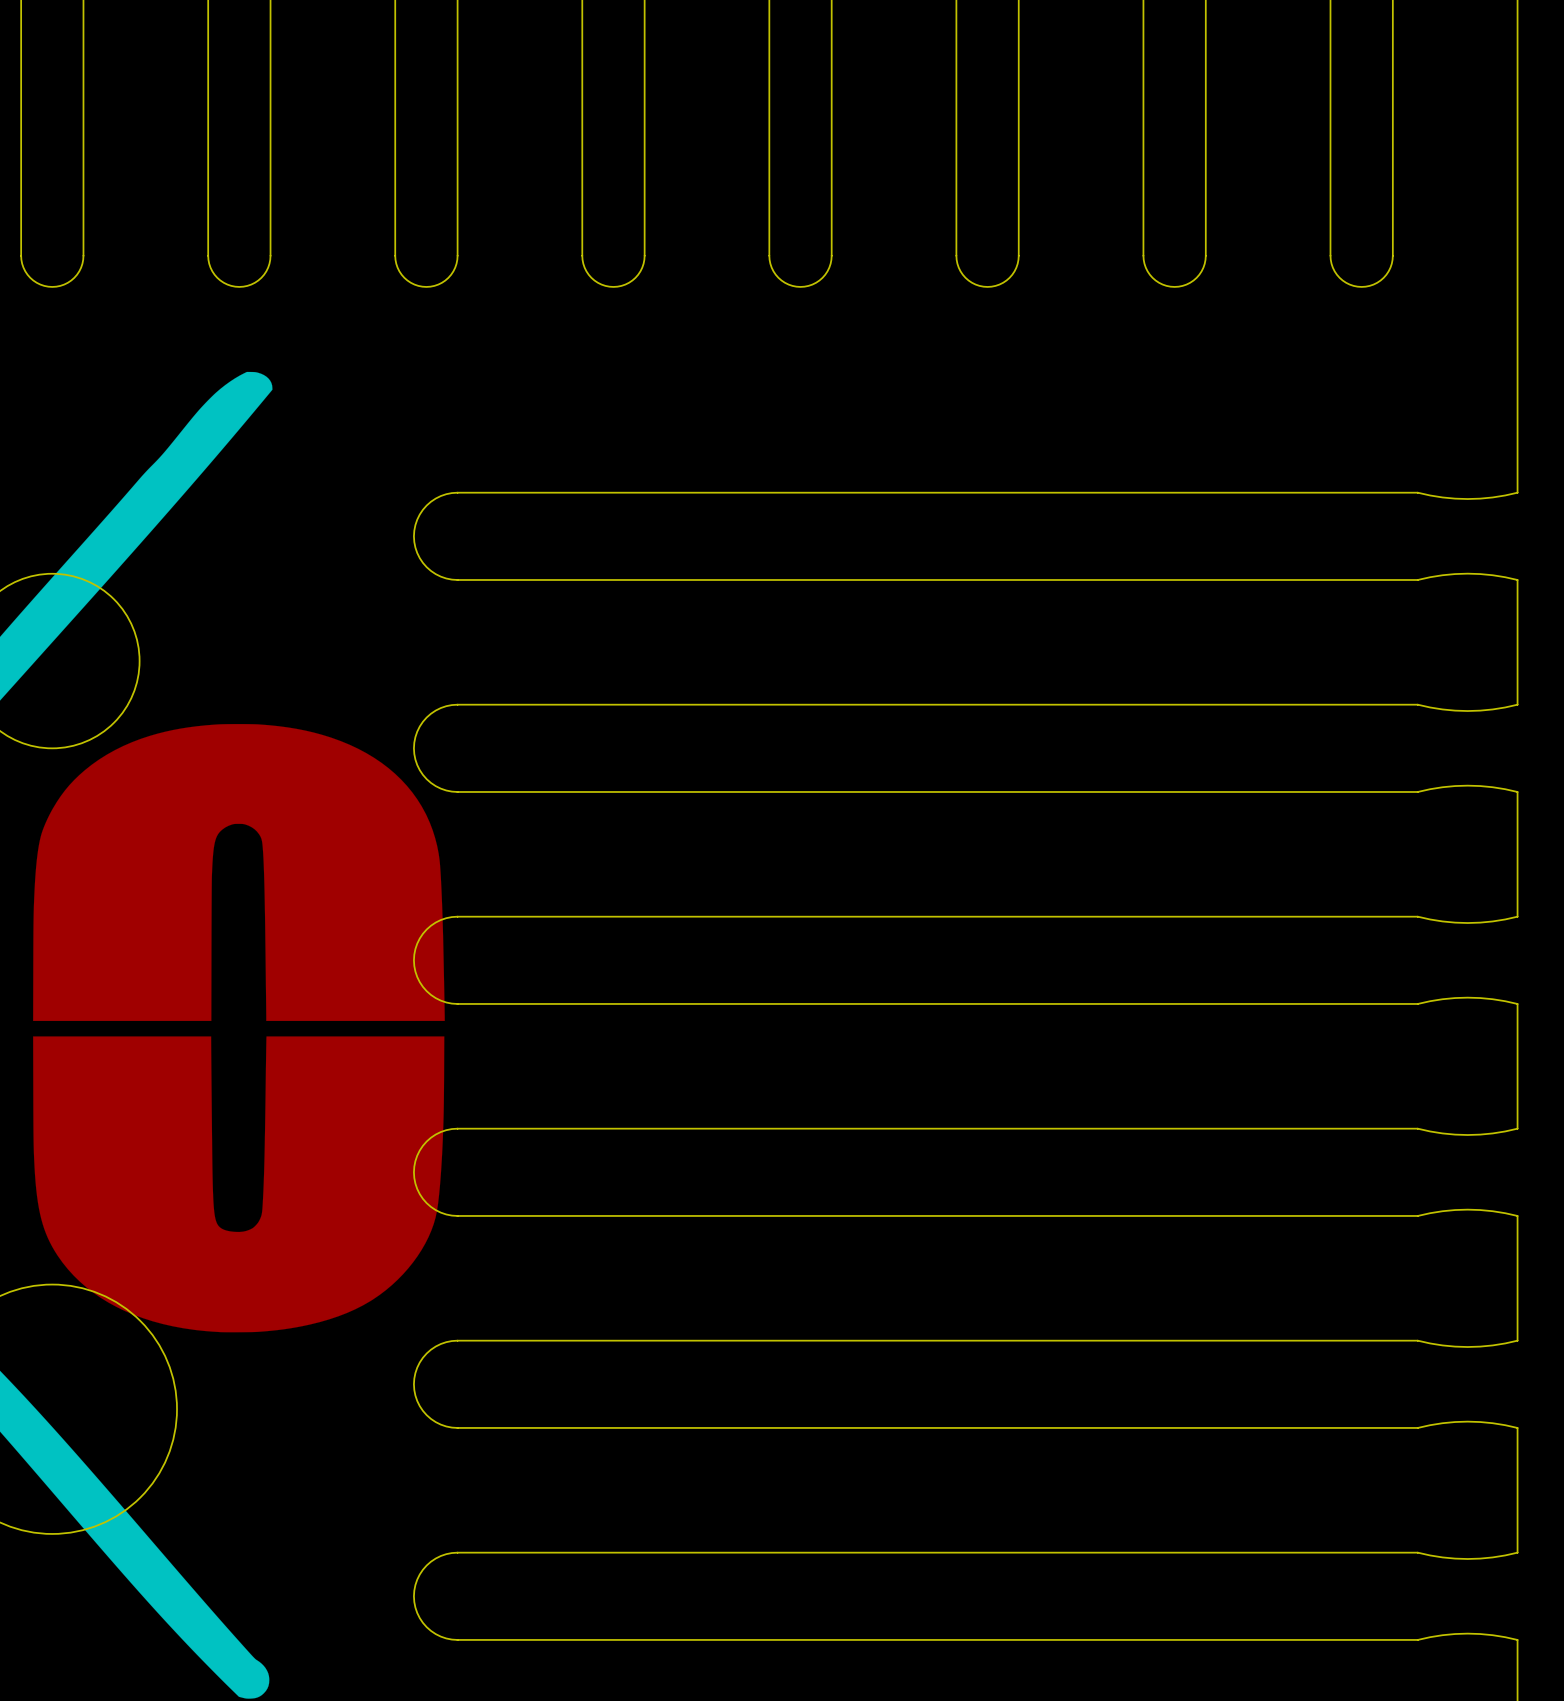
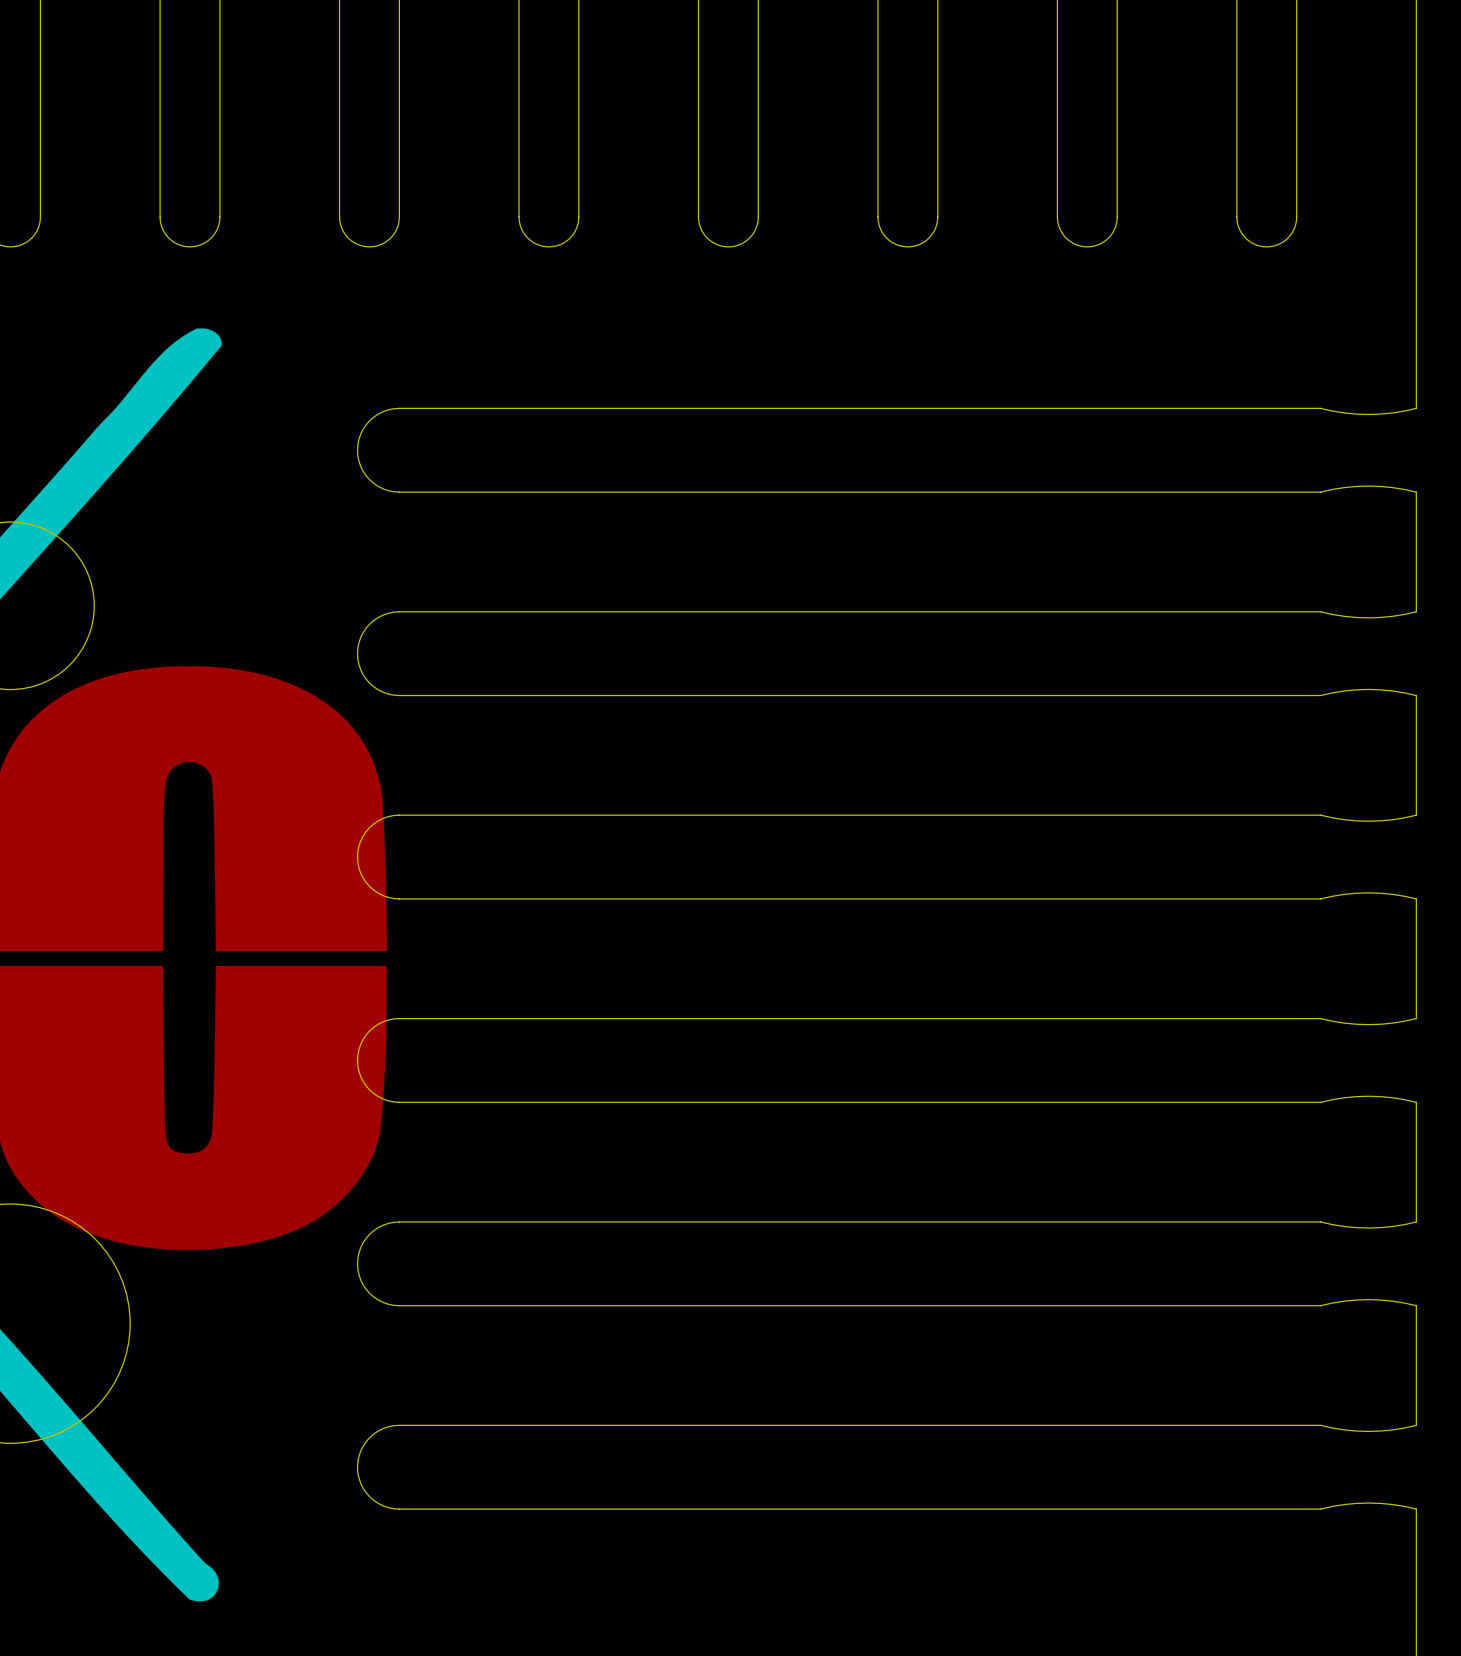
board edge: (1517, 455) (1517, 492) (1480, 498) (1442, 497) (1417, 492) (457, 492) (440, 496) (426, 505) (417, 519) (413, 536) (417, 553) (426, 567) (440, 576) (457, 579) (1417, 579) (1442, 575) (1467, 573) (1492, 575) (1517, 579) -> (1416, 408) (1392, 412) (1368, 414) (1344, 412) (1320, 408) (399, 408) (383, 411) (369, 420) (360, 434) (357, 450) (360, 466) (369, 479) (383, 488) (399, 492) (1320, 492) (1344, 487) (1380, 486) (1416, 492) (1416, 528)
board edge: (1517, 667) (1517, 704) (1480, 710) (1442, 709) (1417, 704) (457, 704) (440, 708) (426, 717) (417, 731) (413, 748) (417, 765) (426, 779) (440, 788) (457, 791) (1417, 791) (1442, 787) (1467, 785) (1492, 787) (1517, 791) -> (1416, 611) (1392, 616) (1368, 617) (1344, 616) (1320, 611) (399, 611) (383, 614) (369, 624) (360, 637) (357, 653) (360, 669) (369, 683) (383, 692) (399, 695) (1320, 695) (1344, 690) (1380, 689) (1416, 695) (1416, 731)
board edge: (1517, 879) (1517, 916) (1480, 922) (1442, 921) (1417, 916) (457, 916) (440, 920) (426, 929) (417, 943) (413, 960) (417, 977) (426, 991) (440, 1000) (457, 1003) (1417, 1003) (1442, 999) (1467, 997) (1492, 999) (1517, 1003) -> (1416, 815) (1392, 819) (1368, 821) (1344, 819) (1320, 815) (399, 815) (383, 818) (369, 827) (360, 841) (357, 857) (360, 873) (369, 886) (383, 895) (399, 898) (1320, 898) (1344, 894) (1380, 893) (1416, 898) (1416, 934)
board edge: (1517, 1091) (1517, 1128) (1480, 1134) (1442, 1133) (1417, 1128) (457, 1128) (440, 1132) (426, 1141) (417, 1155) (413, 1172) (417, 1189) (426, 1203) (440, 1212) (457, 1215) (1417, 1215) (1442, 1211) (1467, 1209) (1492, 1211) (1517, 1215) -> (1416, 1018) (1392, 1023) (1368, 1024) (1344, 1023) (1320, 1018) (399, 1018) (383, 1021) (369, 1030) (360, 1044) (357, 1060) (360, 1076) (369, 1090) (383, 1099) (399, 1102) (1320, 1102) (1344, 1097) (1380, 1096) (1416, 1102) (1416, 1138)
board edge: (1517, 1303) (1517, 1340) (1480, 1346) (1442, 1345) (1417, 1340) (457, 1340) (440, 1343) (426, 1353) (417, 1367) (413, 1384) (417, 1401) (426, 1415) (440, 1424) (457, 1427) (1417, 1427) (1442, 1423) (1467, 1421) (1492, 1423) (1517, 1427) -> (1416, 1221) (1392, 1226) (1368, 1228) (1344, 1226) (1320, 1221) (399, 1221) (383, 1225) (369, 1234) (360, 1247) (357, 1263) (360, 1279) (369, 1293) (383, 1302) (399, 1305) (1320, 1305) (1344, 1301) (1380, 1300) (1416, 1305) (1416, 1341)
board edge: (1517, 1515) (1517, 1552) (1480, 1558) (1442, 1557) (1417, 1552) (457, 1552) (440, 1555) (426, 1565) (417, 1579) (413, 1596) (417, 1613) (426, 1627) (440, 1636) (457, 1639) (1417, 1639) (1442, 1635) (1467, 1633) (1492, 1635) (1517, 1639) -> (1416, 1425) (1392, 1429) (1368, 1431) (1344, 1429) (1320, 1425) (399, 1425) (383, 1428) (369, 1437) (360, 1451) (357, 1467) (360, 1483) (369, 1496) (383, 1505) (399, 1509) (1320, 1509) (1344, 1504) (1380, 1503) (1416, 1509) (1416, 1544)

